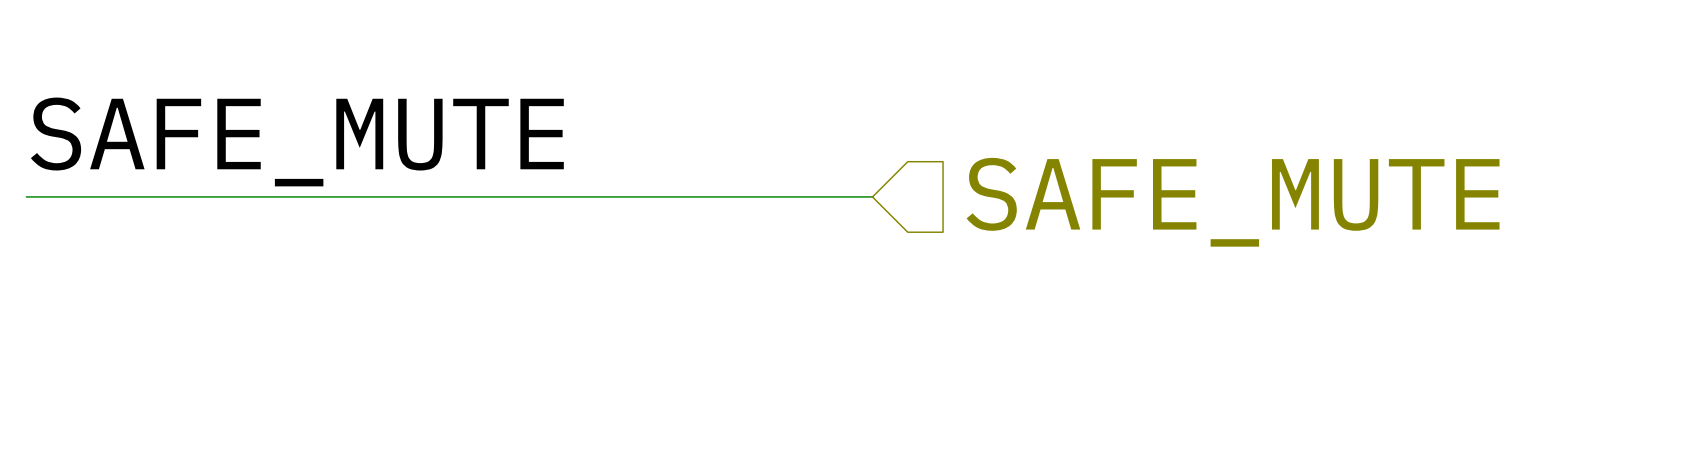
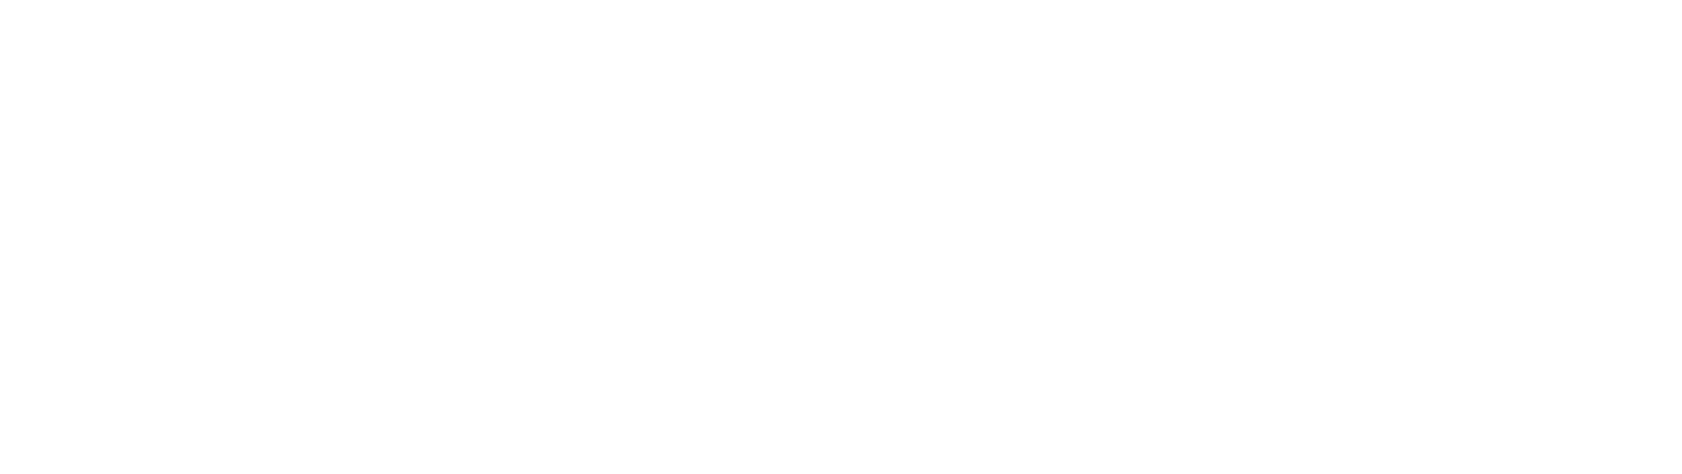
label: SAFE_MUTE (297, 141) -> none
wire: (26, 196) (872, 196) -> none
hierarchical label: SAFE_MUTE (1233, 202) -> none

